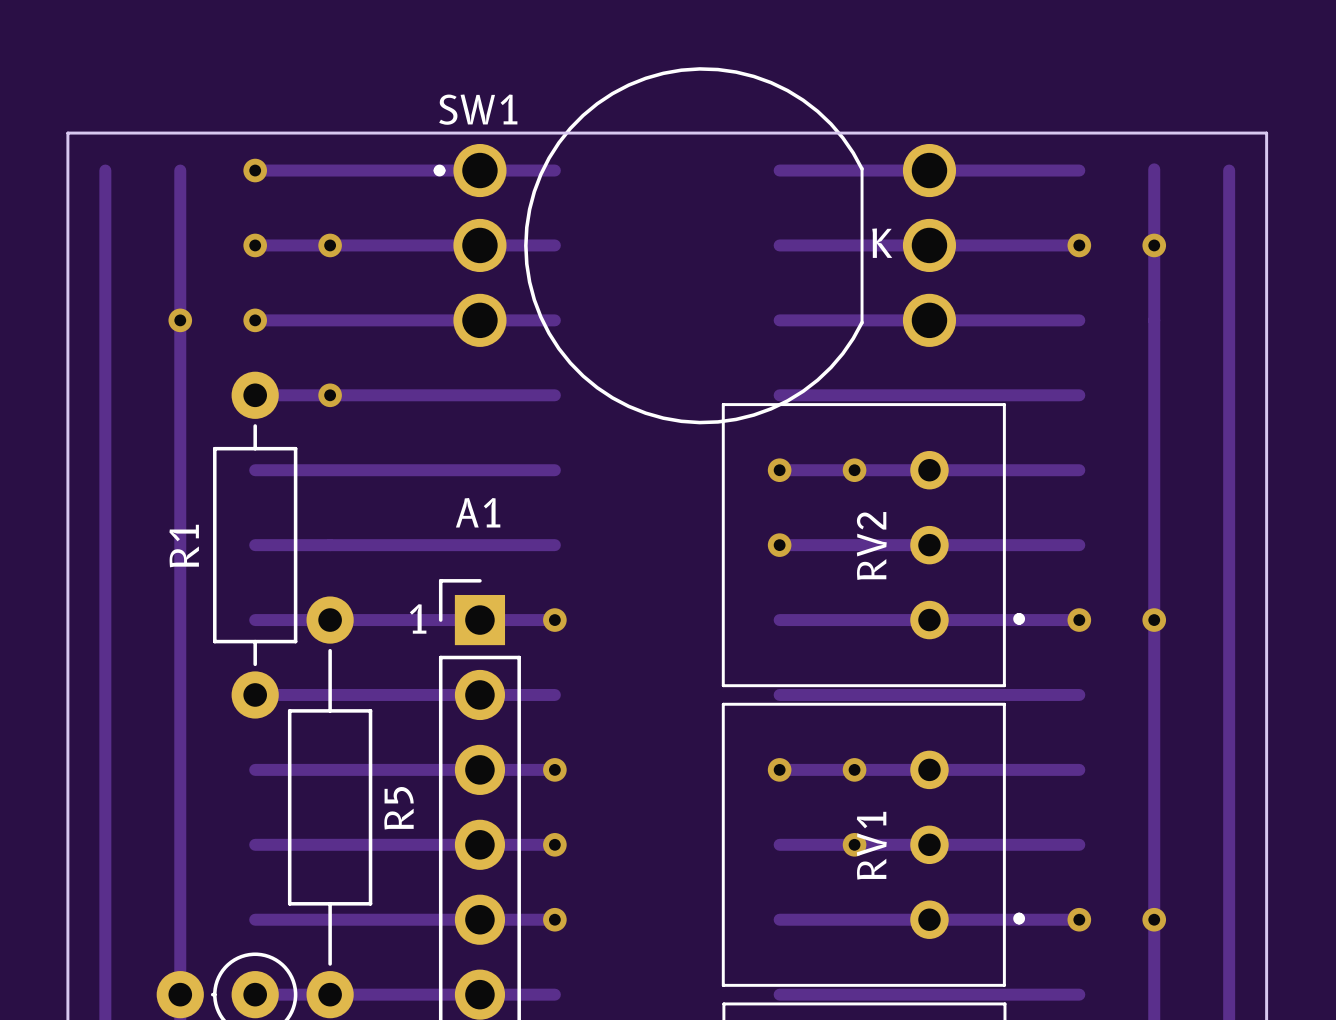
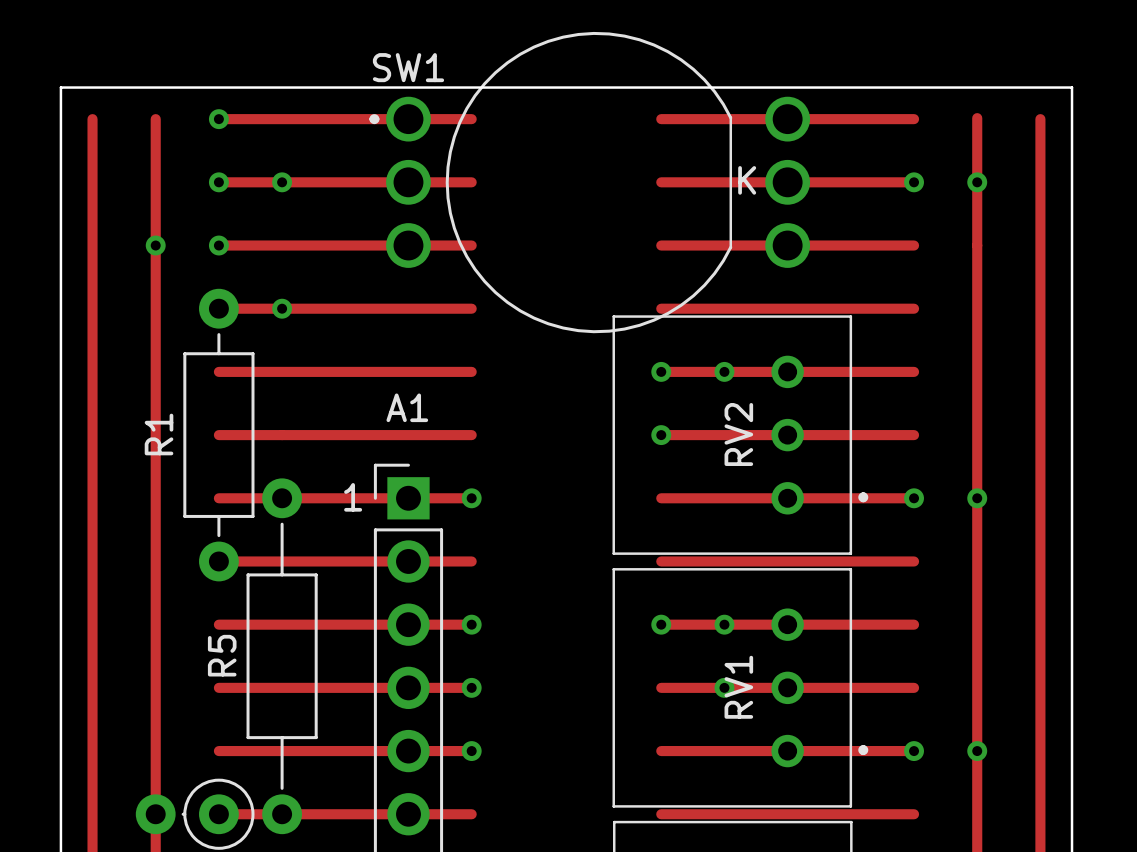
R5 name position: R5 (398, 808) -> R5 (222, 655)

